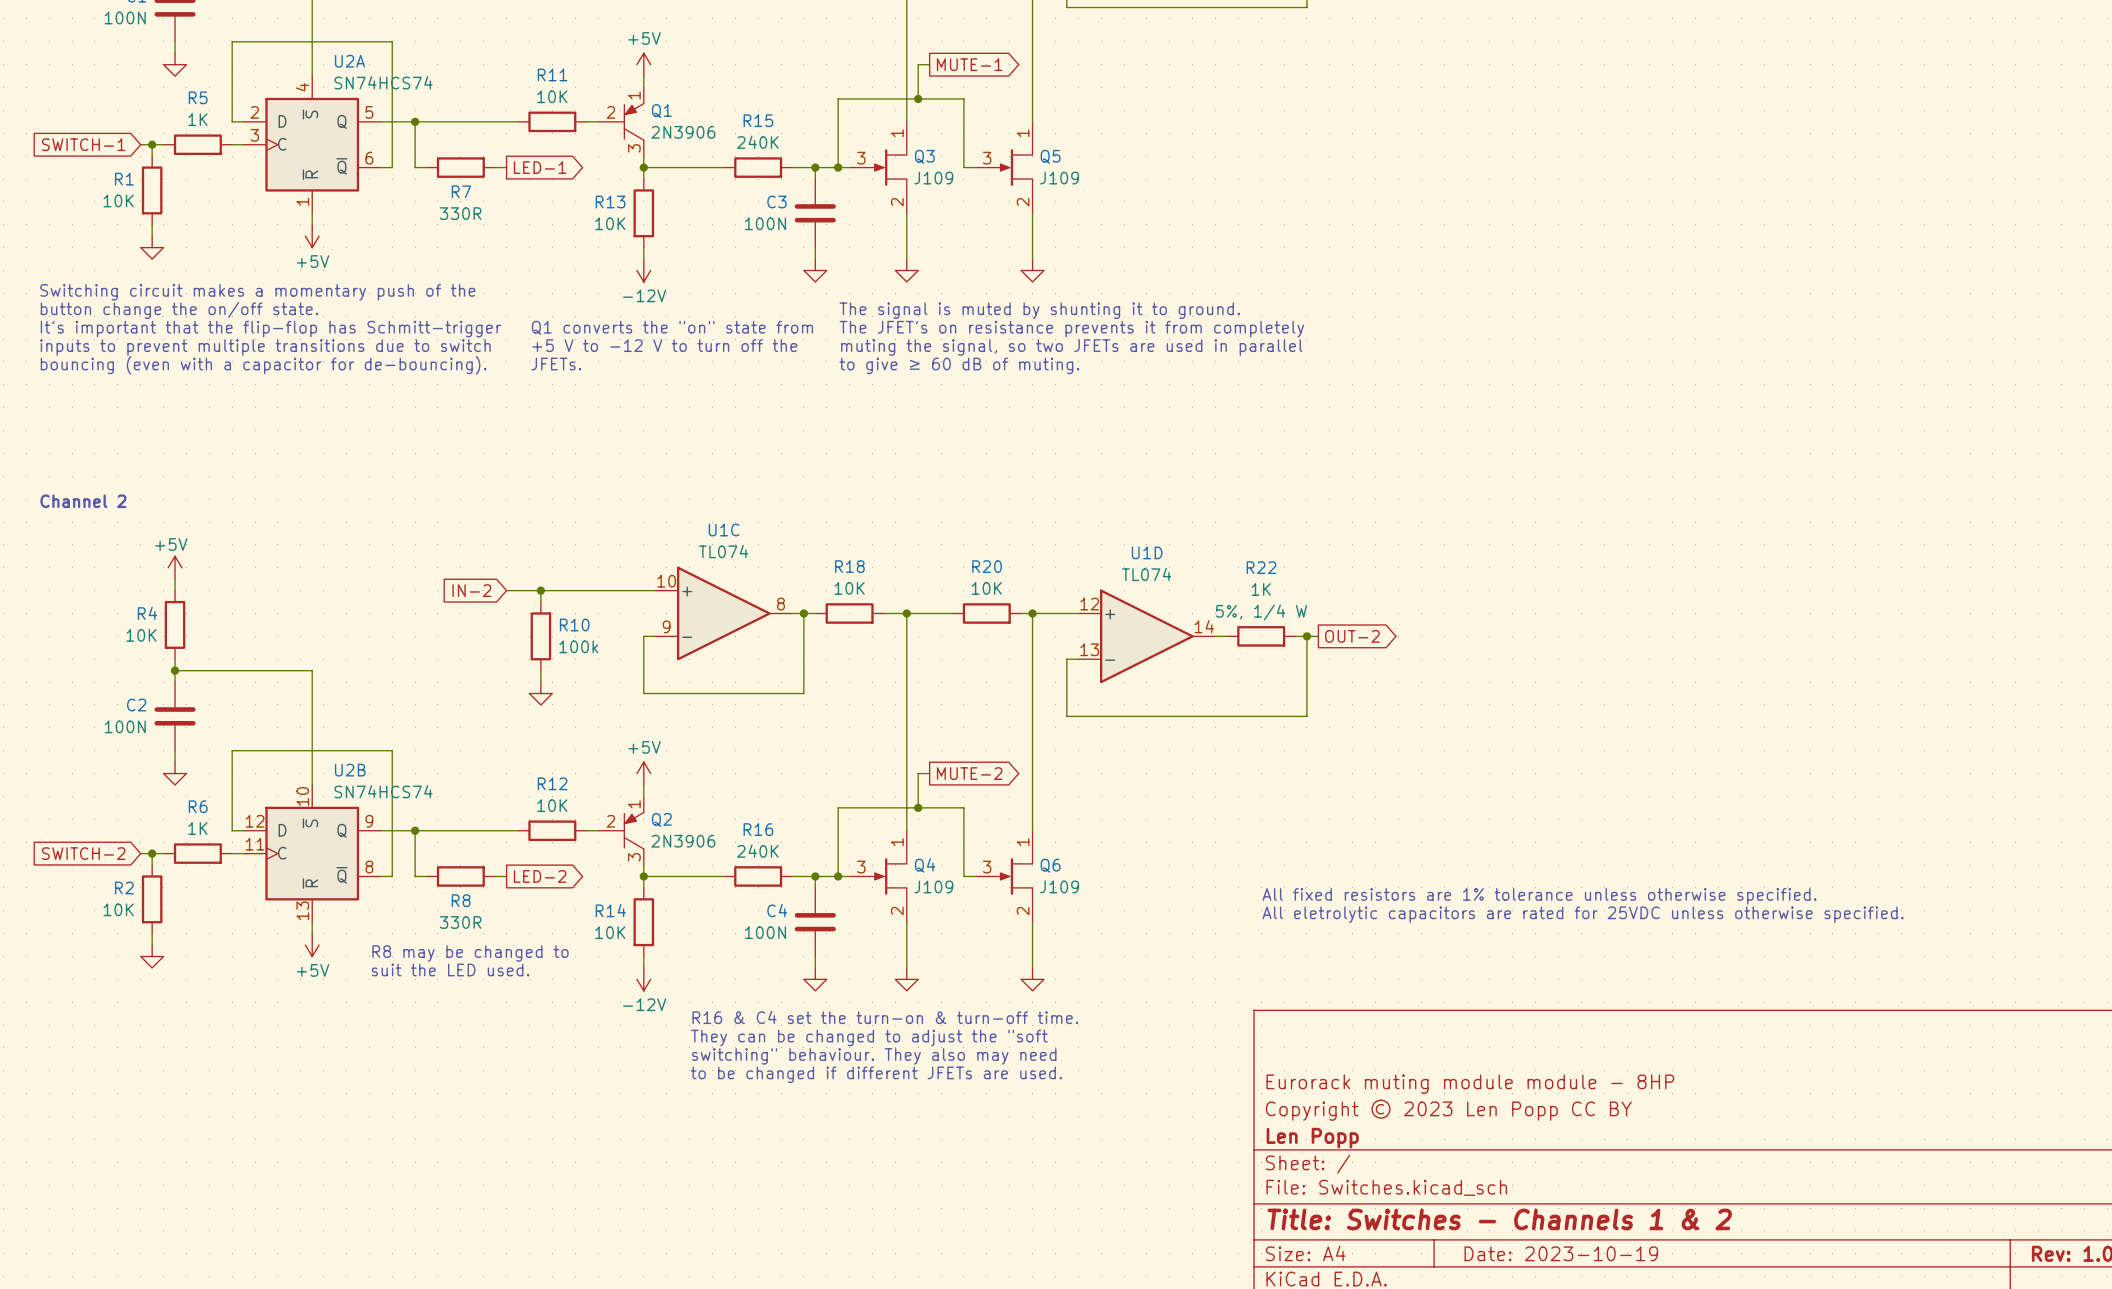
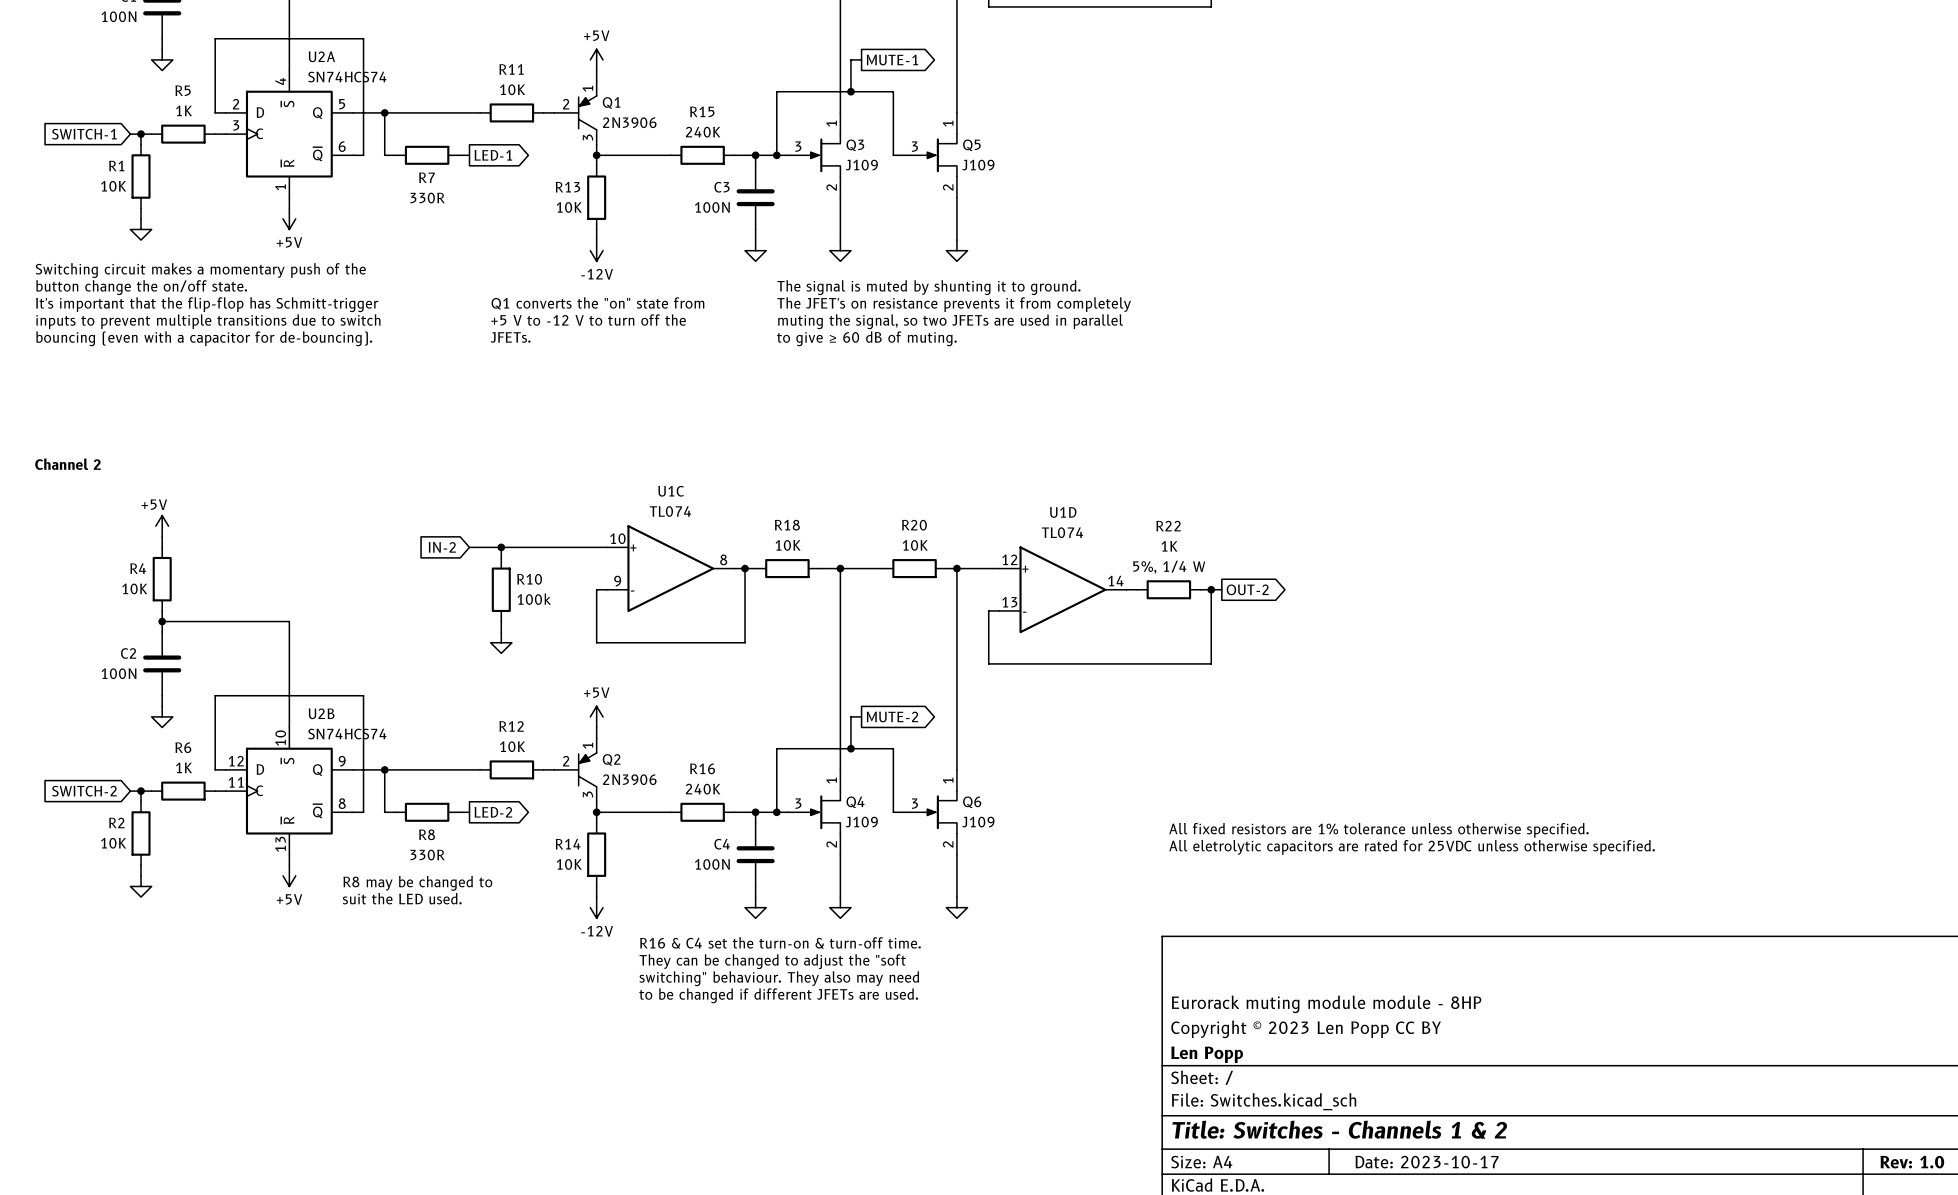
title block: Date: 2023-10-19 (1561, 1253) -> Date: 2023-10-17 (1427, 1162)

